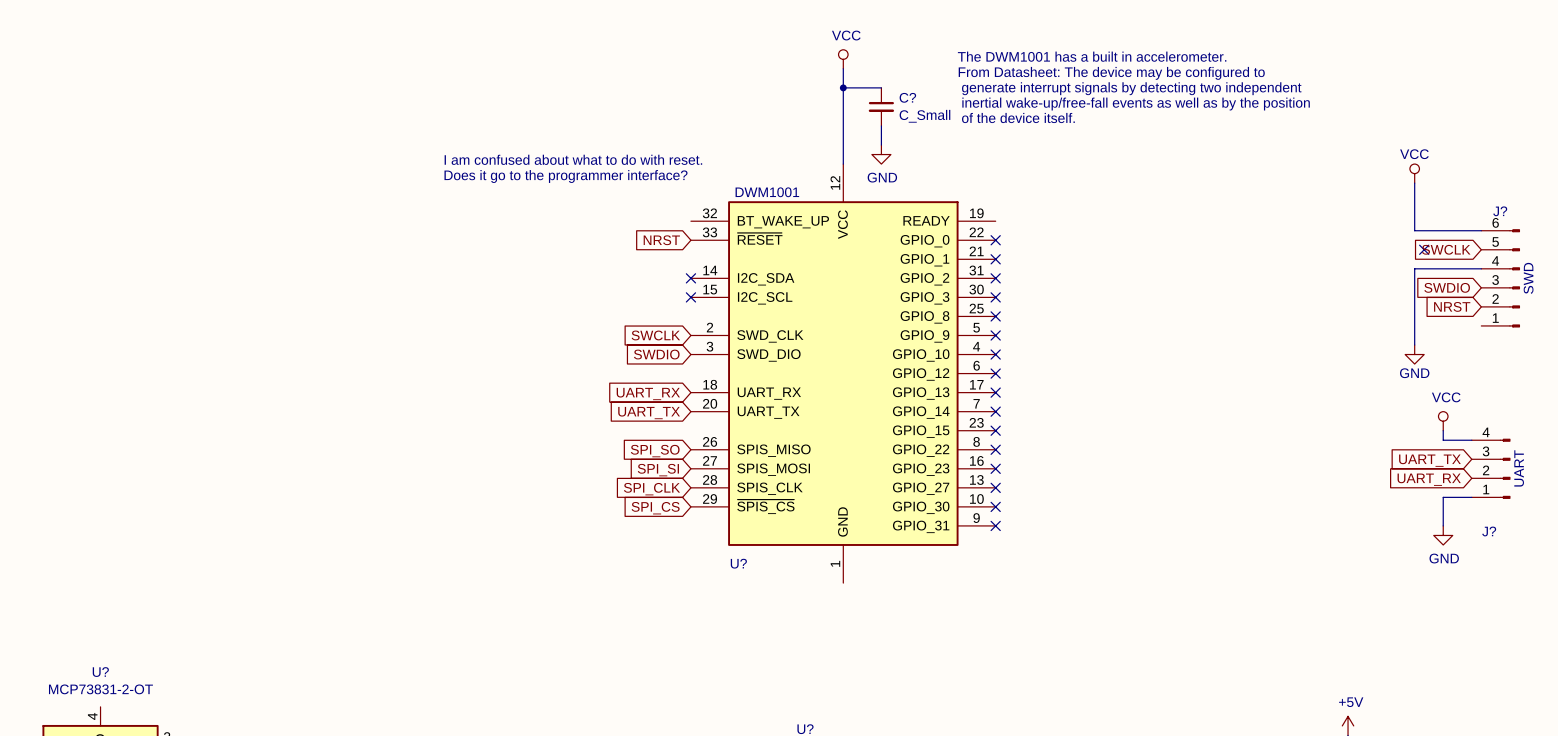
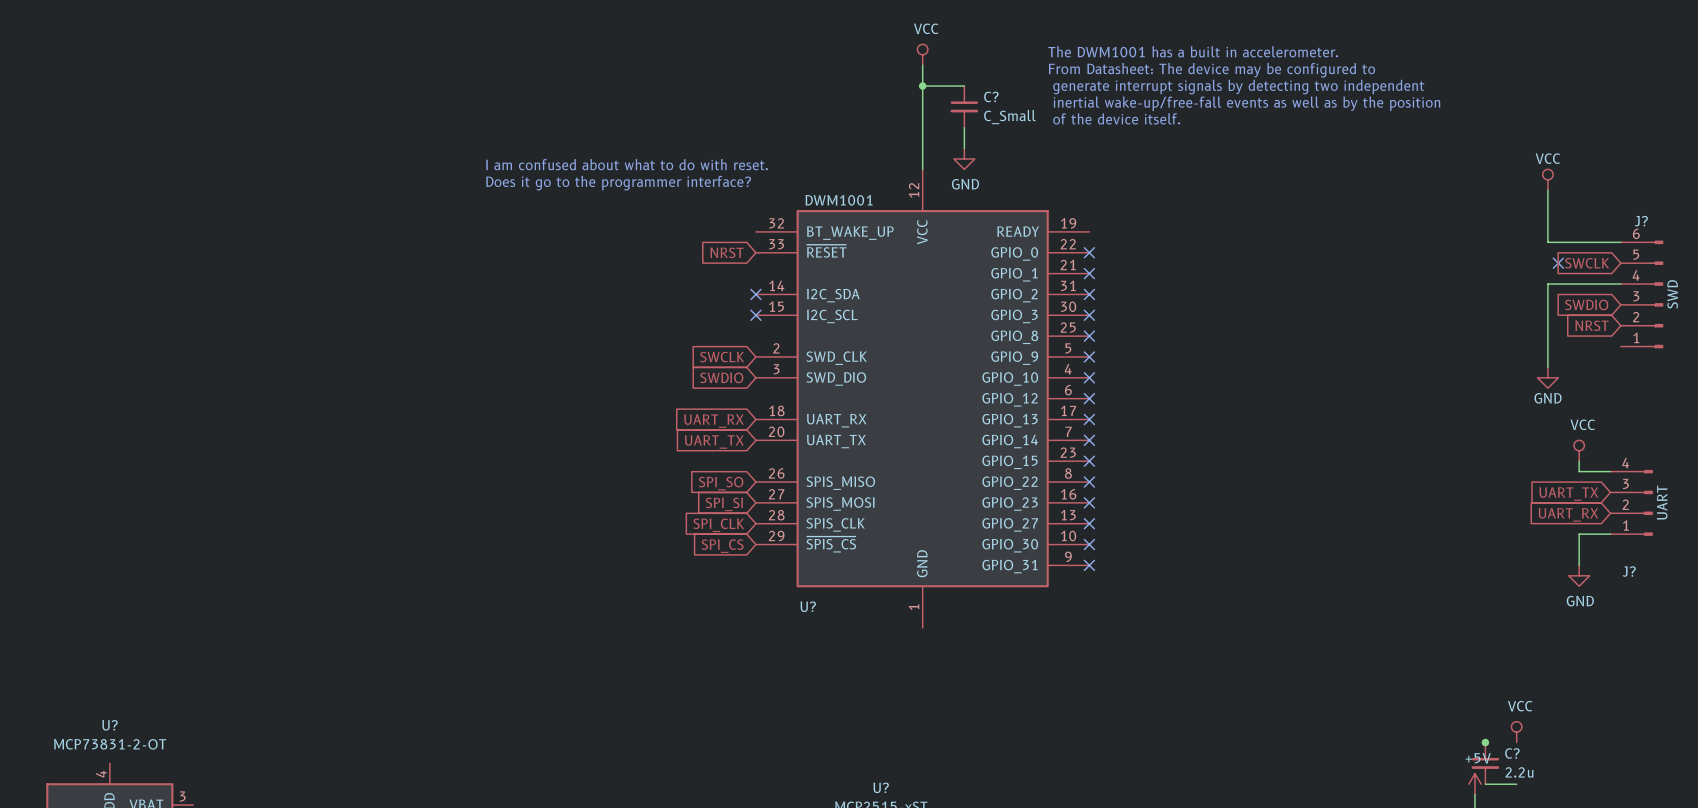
power symbol: none -> VCC (1516, 732)
junction: none -> (1485, 742)
C?: none -> 2.2u (1485, 763)
wire: none -> (1485, 784) (1516, 784)

